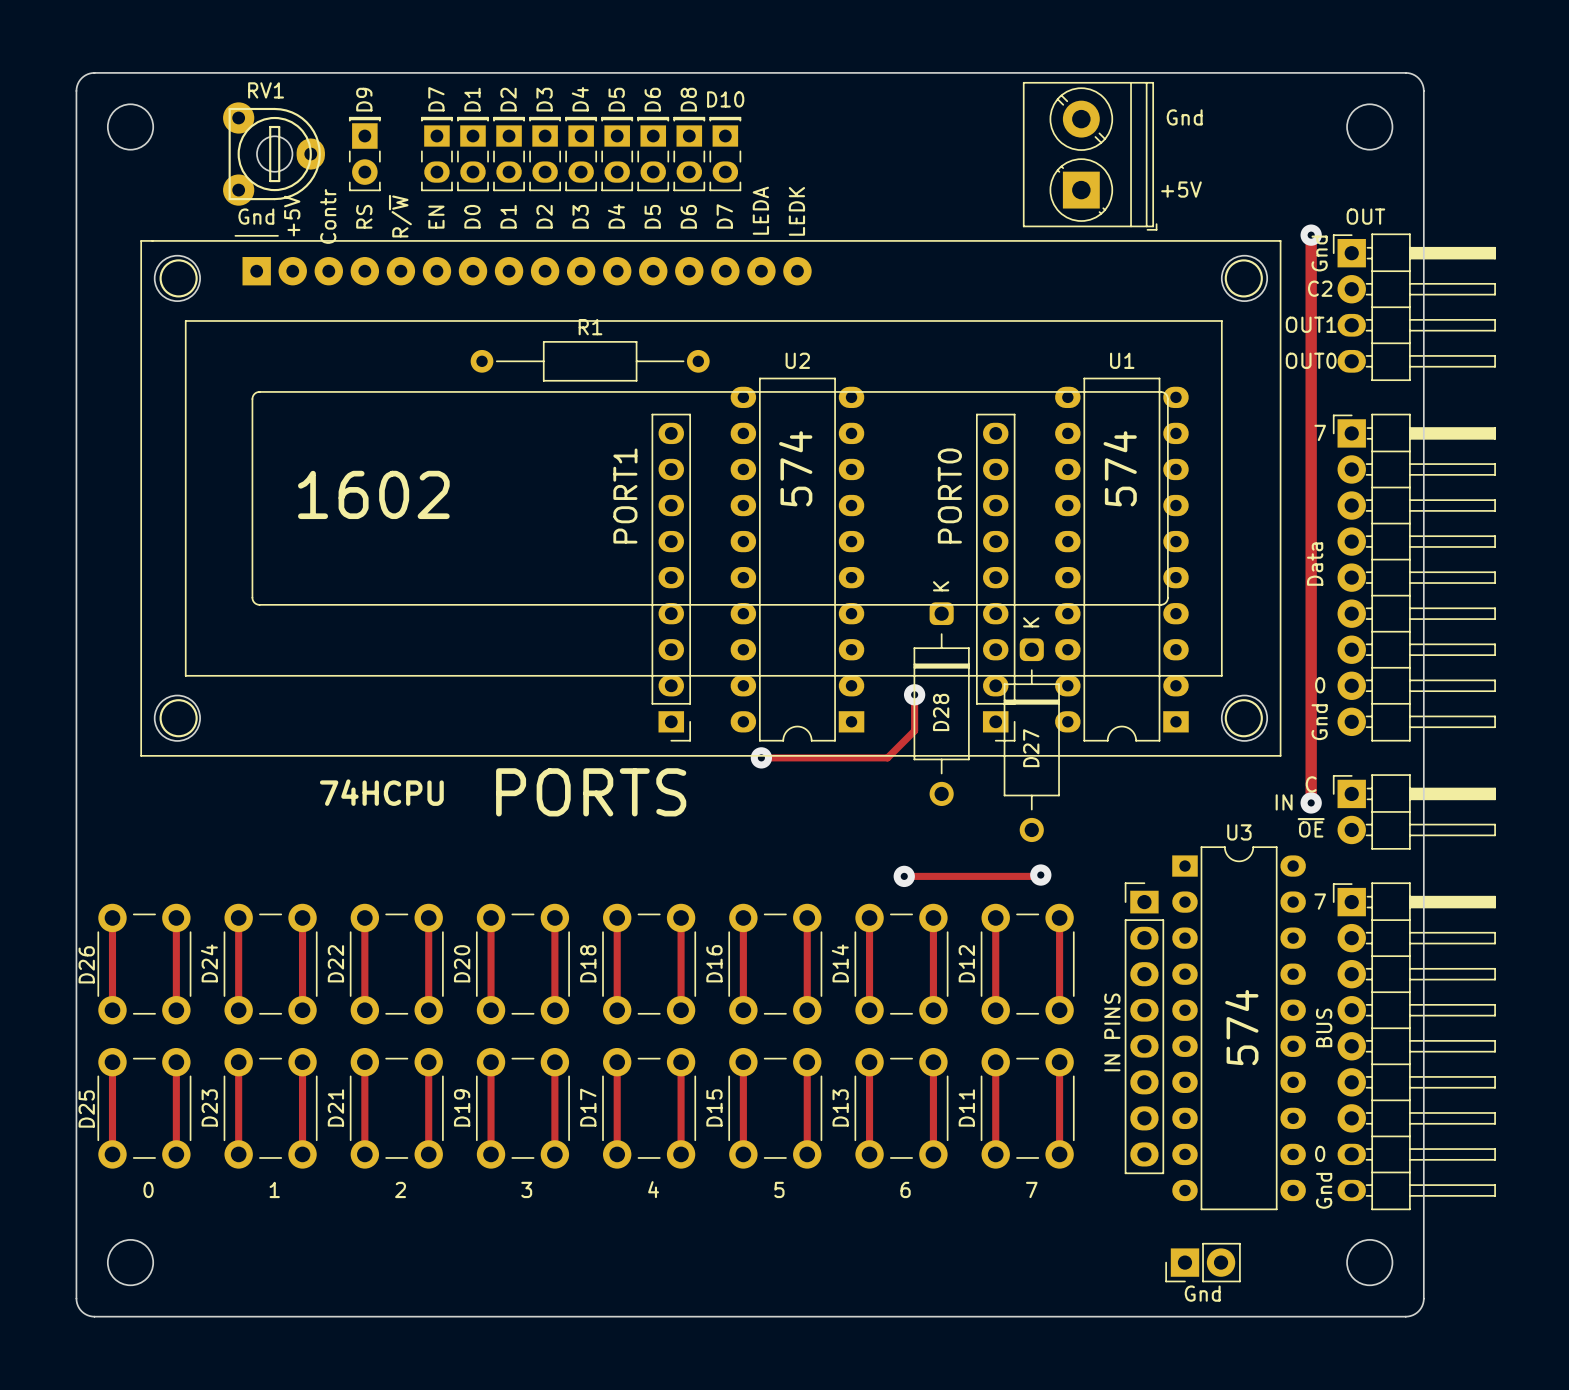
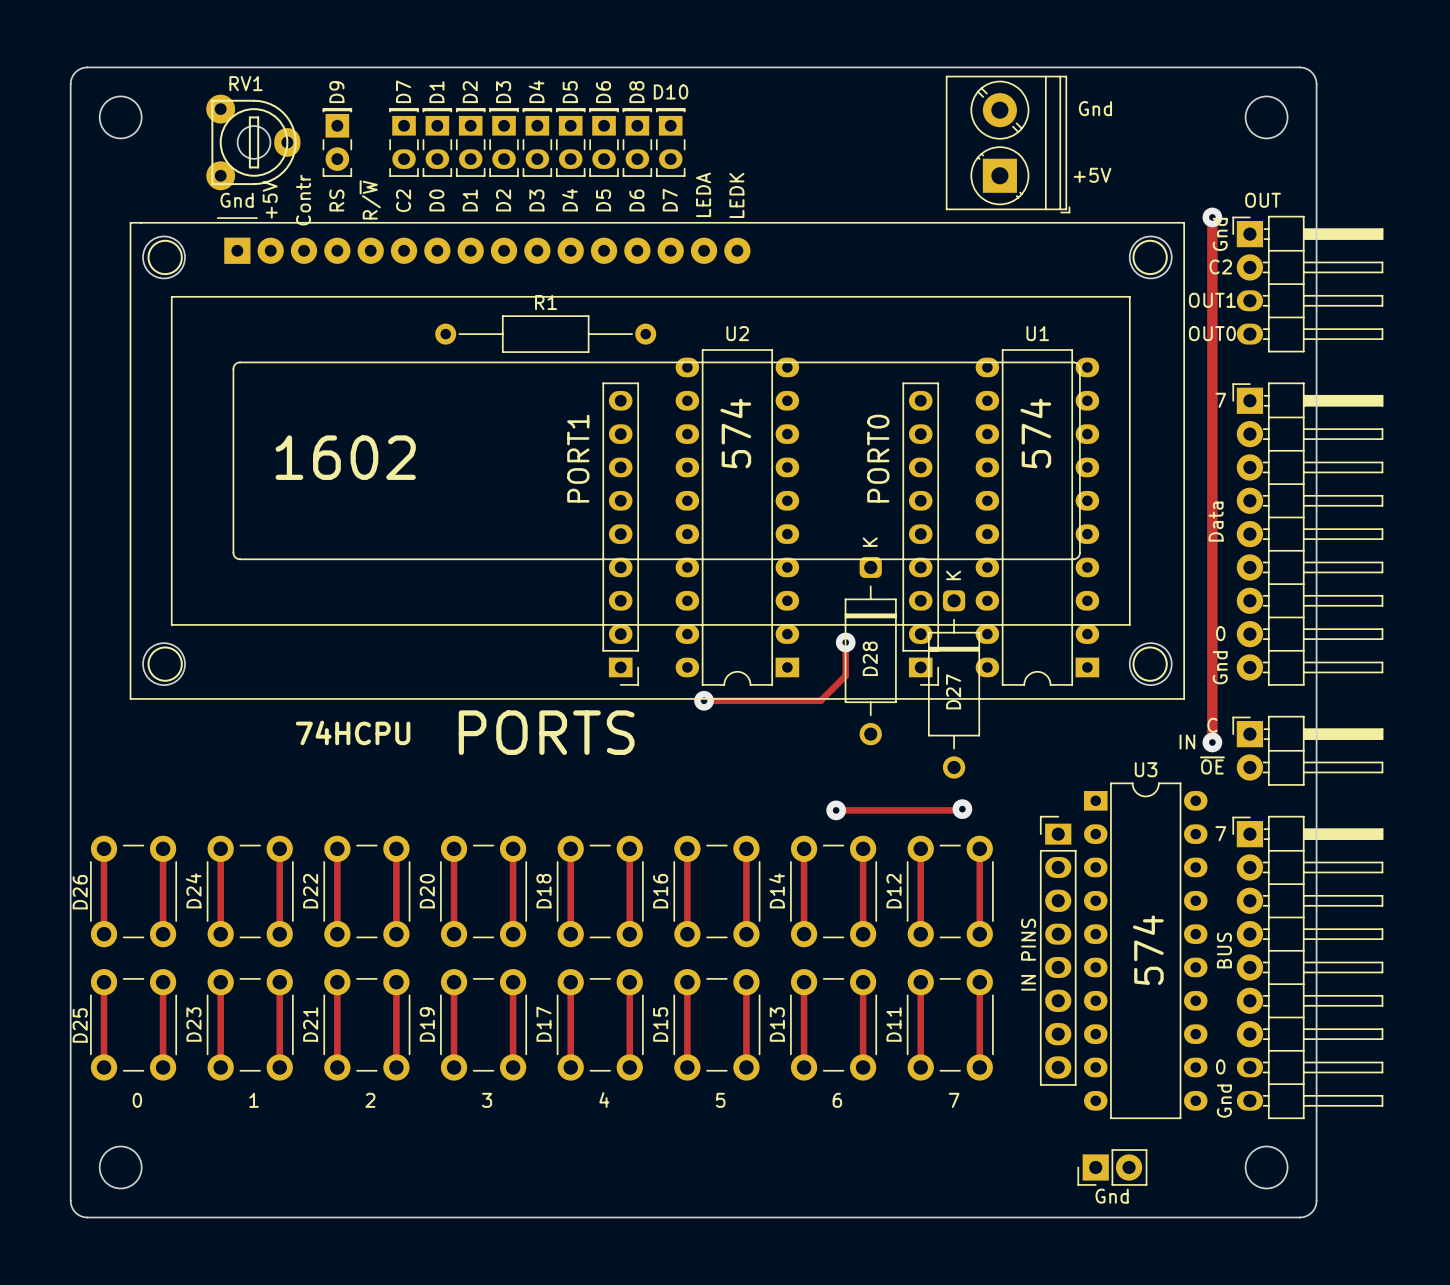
text: EN (436, 217) -> C2 (403, 200)

